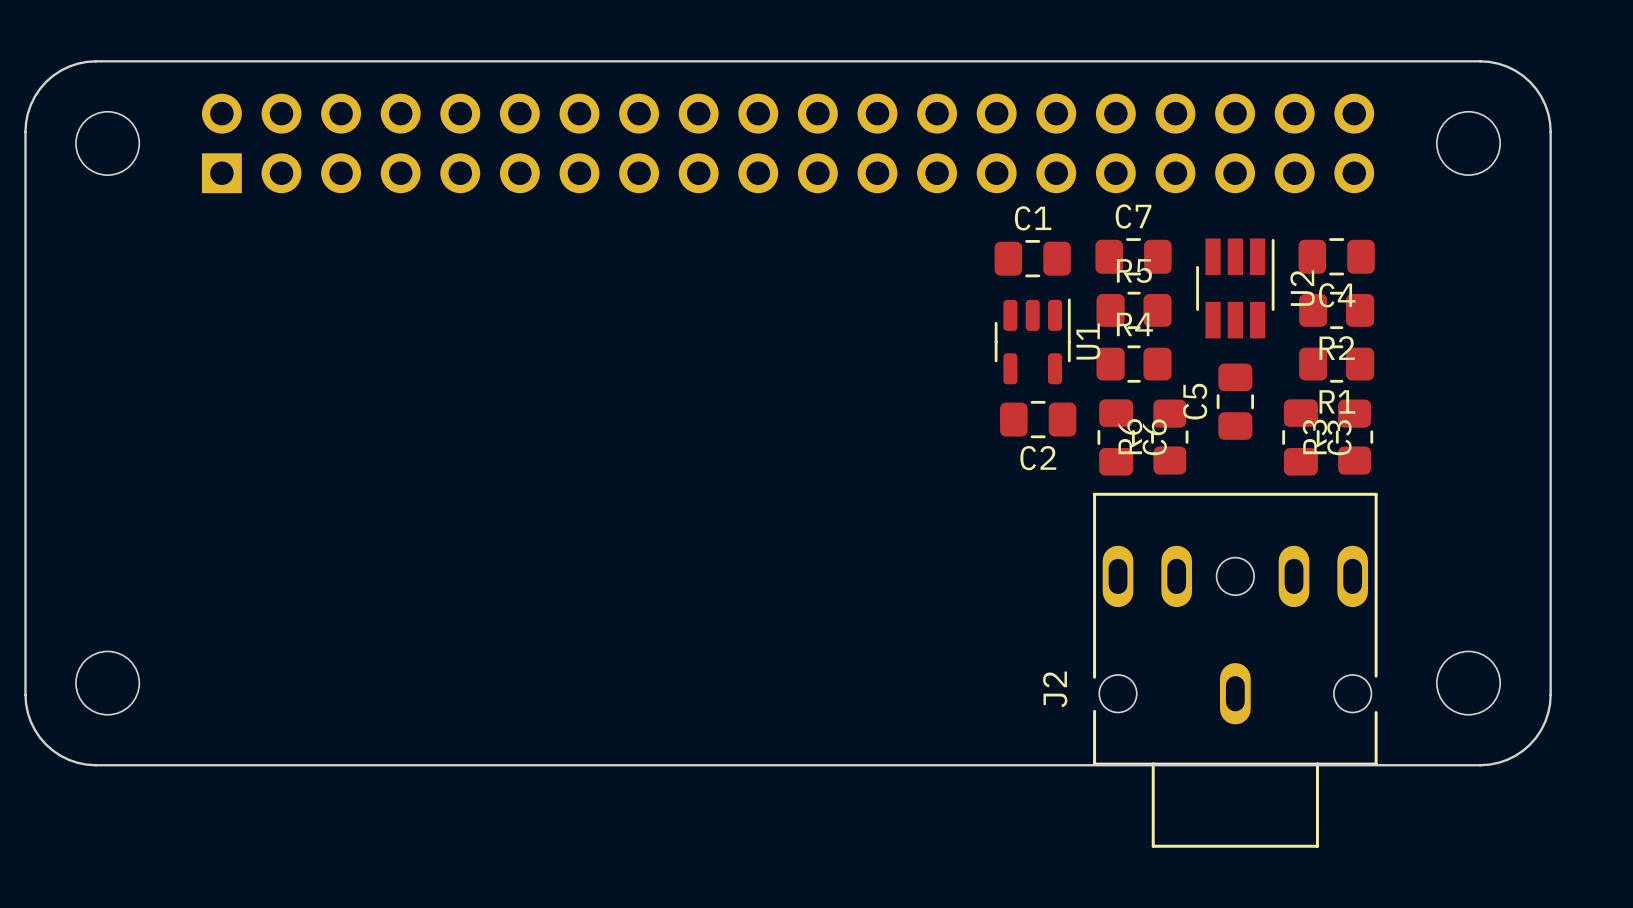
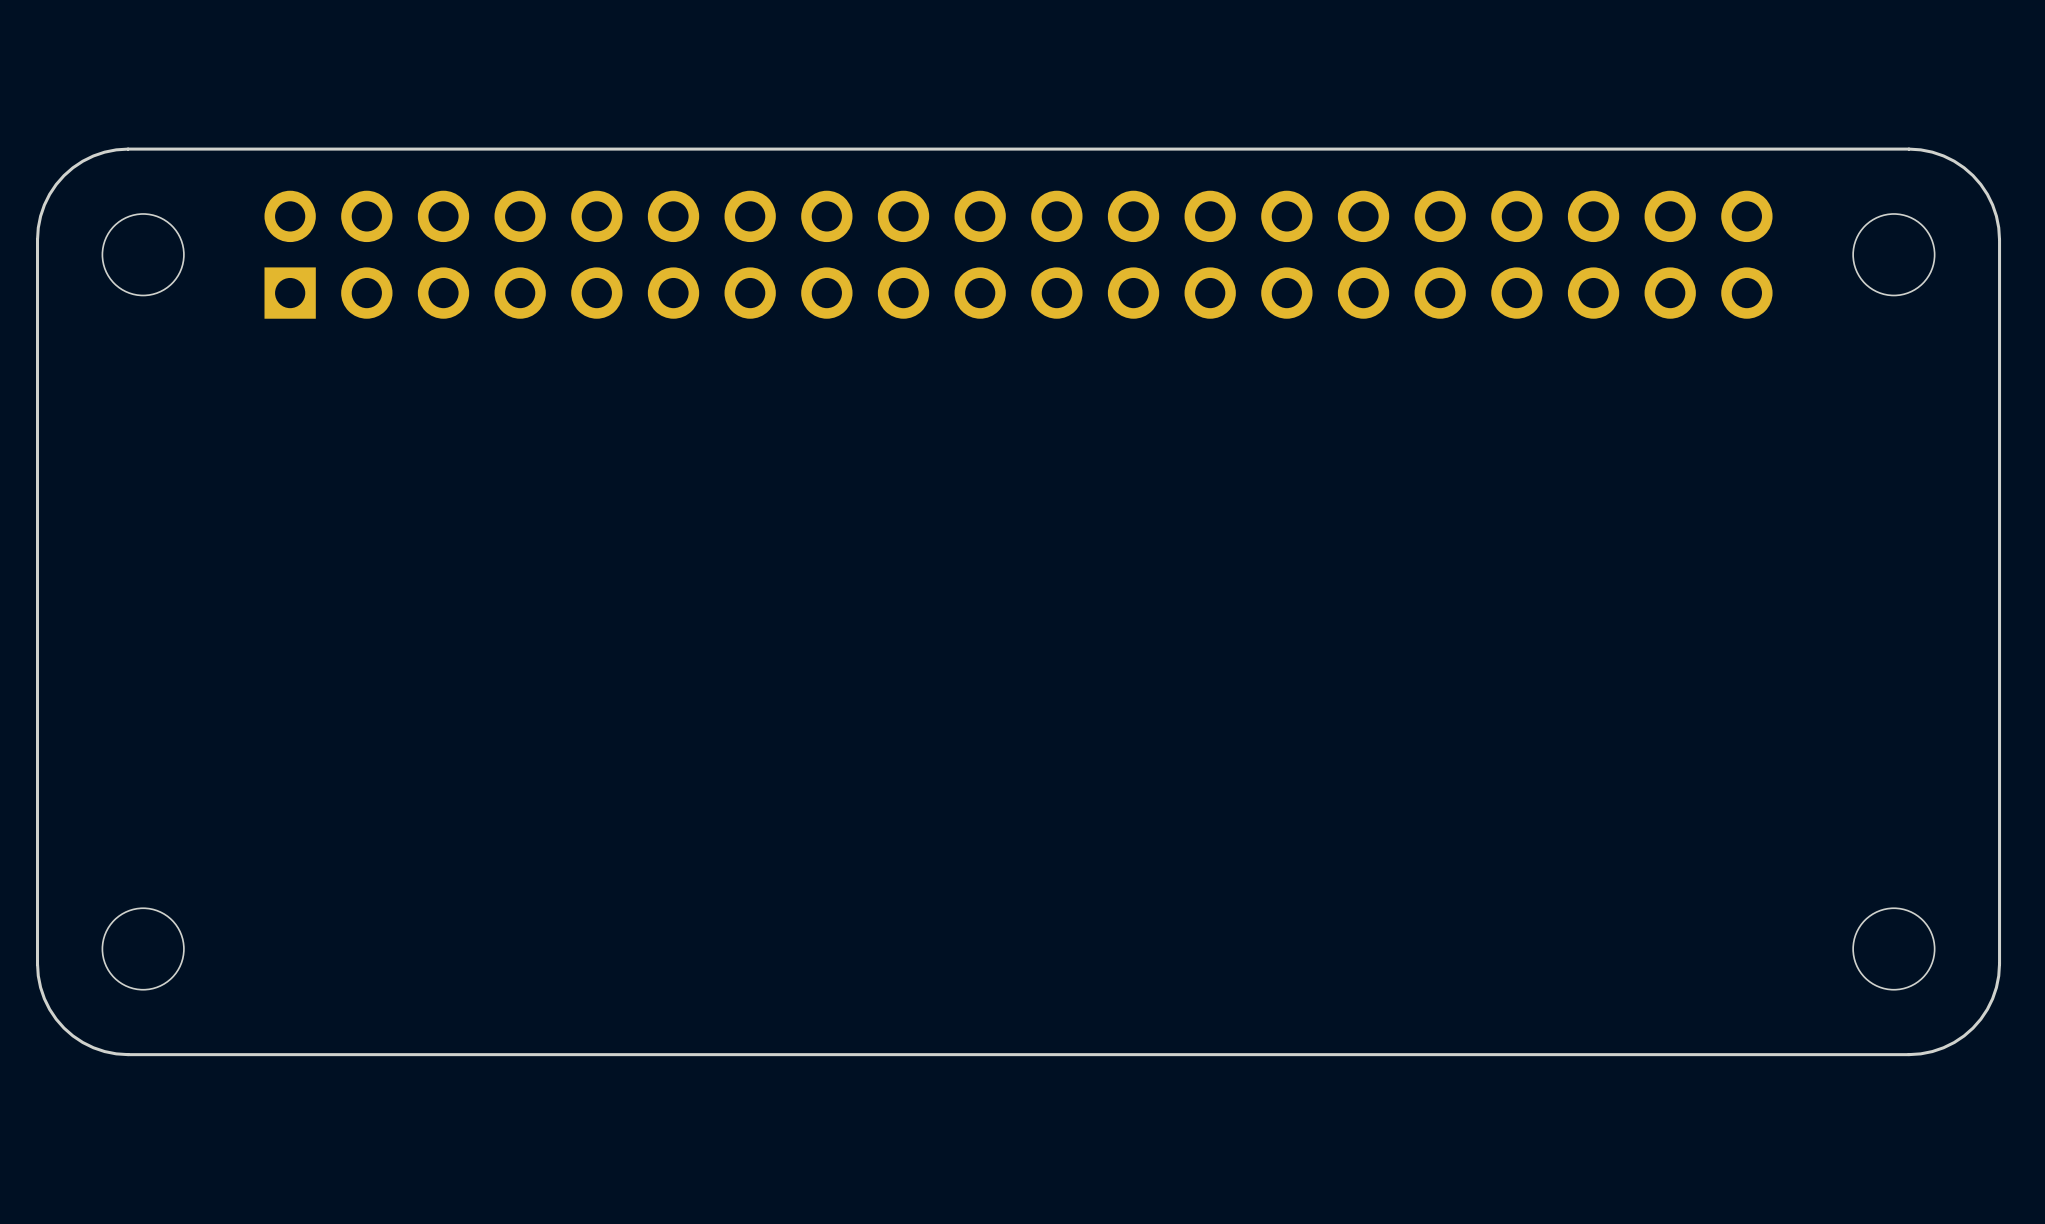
C7: (1133, 256) -> none
C4: (1336, 256) -> none
C1: (1032, 258) -> none
U2: (1235, 288) -> none
R5: (1134, 310) -> none
R2: (1336, 310) -> none
U1: (1032, 341) -> none
R4: (1134, 364) -> none
R1: (1336, 364) -> none
C5: (1235, 401) -> none
C2: (1038, 419) -> none
C6: (1116, 437) -> none
R6: (1169, 437) -> none
C3: (1300, 437) -> none
R3: (1354, 437) -> none
J2: (1235, 670) -> none

